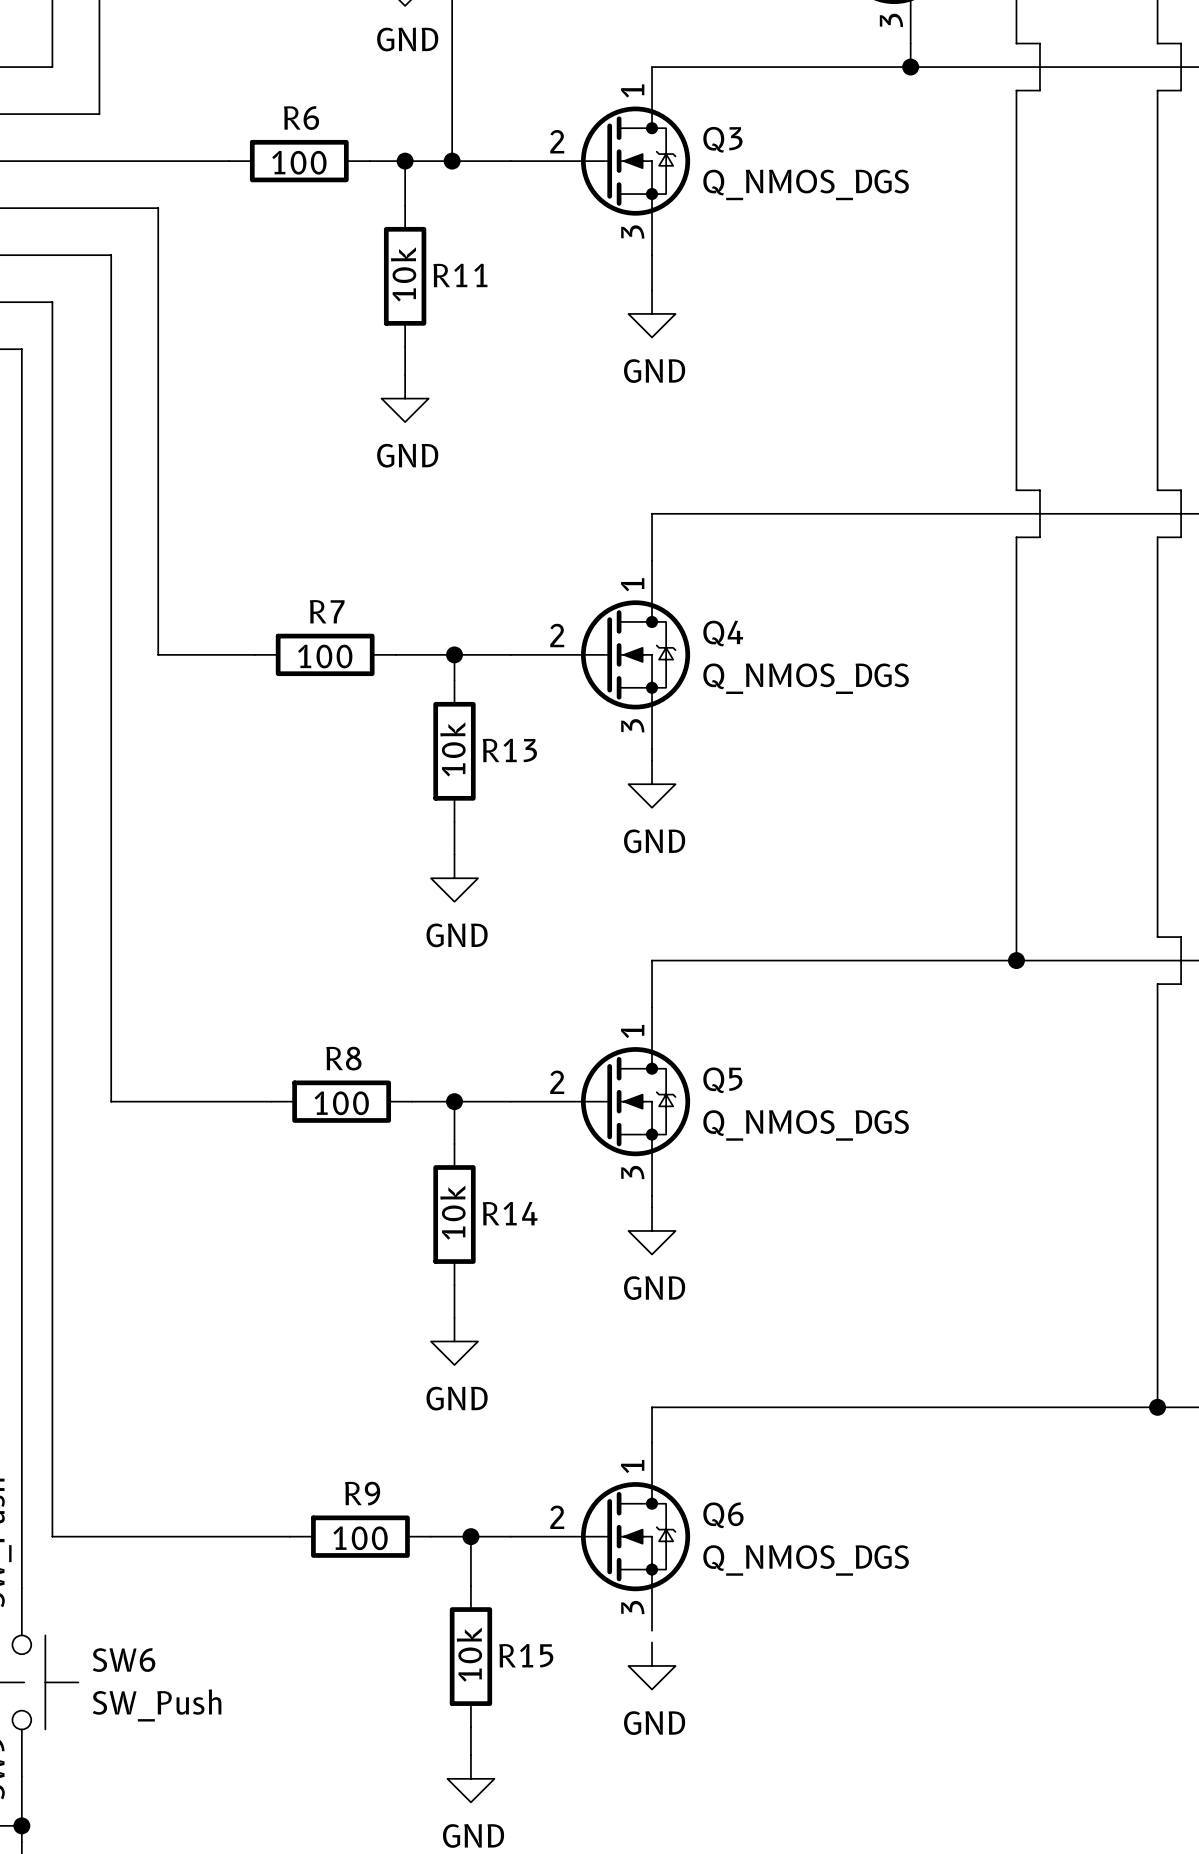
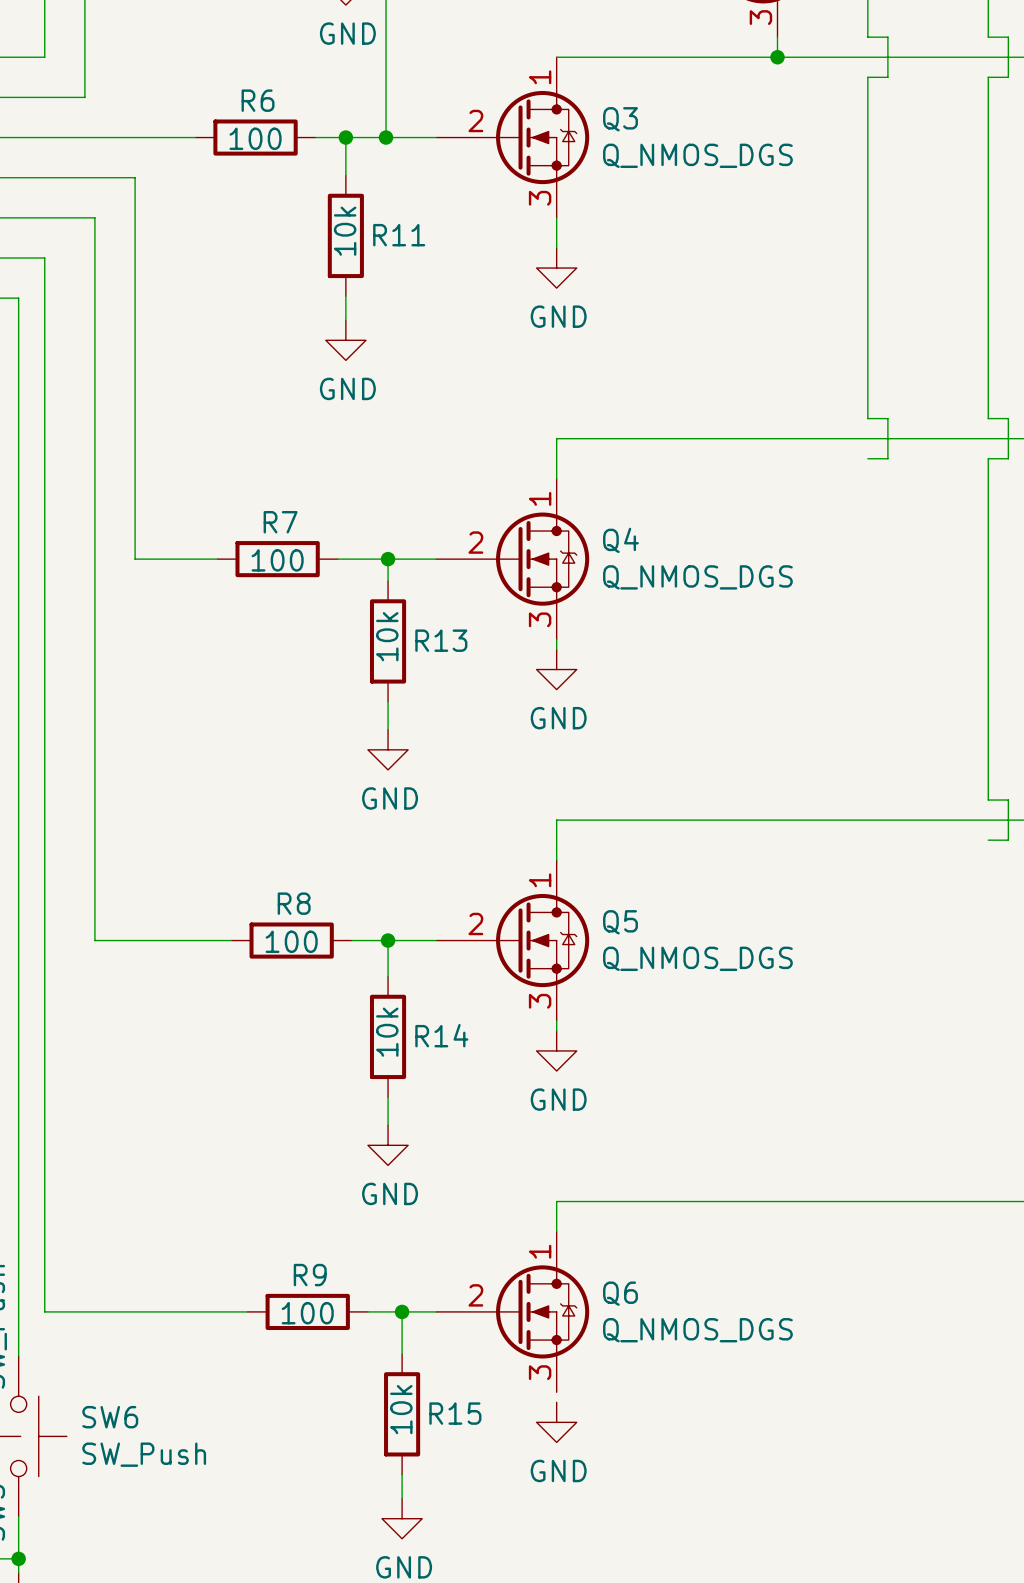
wire: (1016, 537) (1016, 960) -> none
junction: (1016, 960) -> none
wire: (1157, 984) (1157, 1407) -> none
junction: (1157, 1407) -> none

